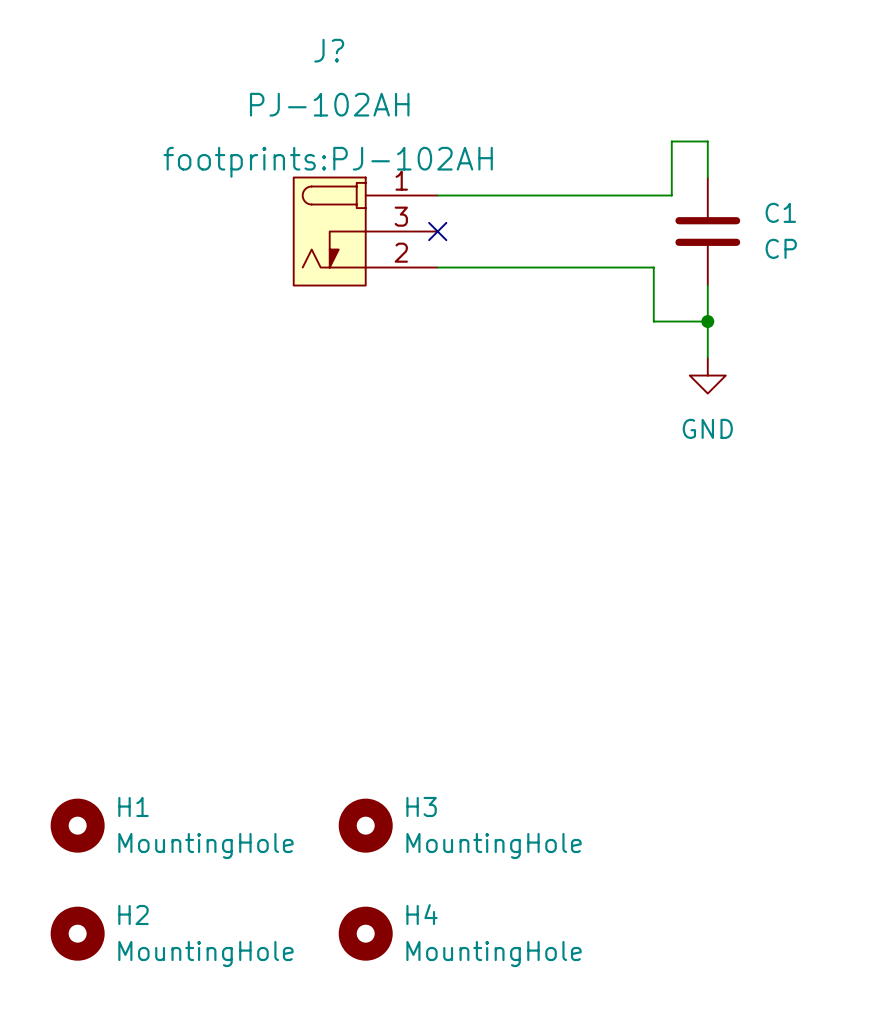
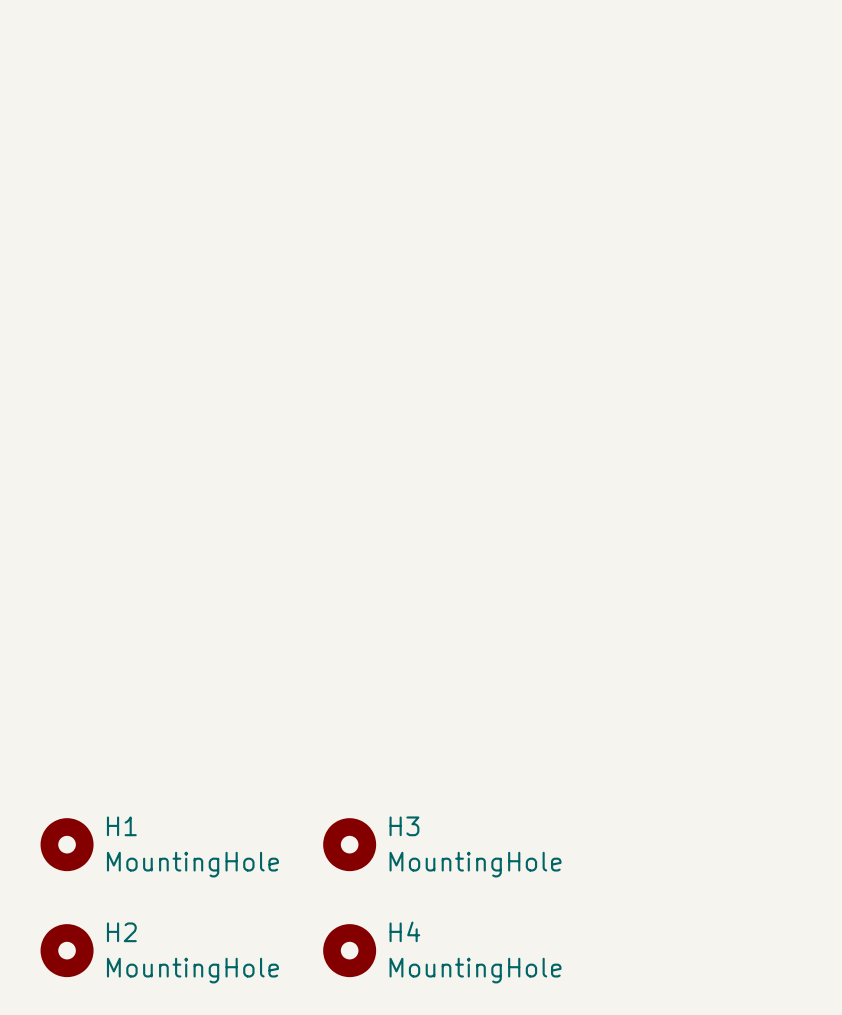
wire: (707, 177) (707, 141) (671, 141) (671, 195) (437, 195) -> none
J?: PJ-102AH (365, 231) -> none
no-connect mark: (437, 231) -> none
C1: CP (707, 231) -> none
wire: (437, 267) (653, 267) (653, 321) (707, 321) -> none
wire: (707, 285) (707, 357) -> none
junction: (707, 321) -> none
power symbol: GND (707, 375) -> none

